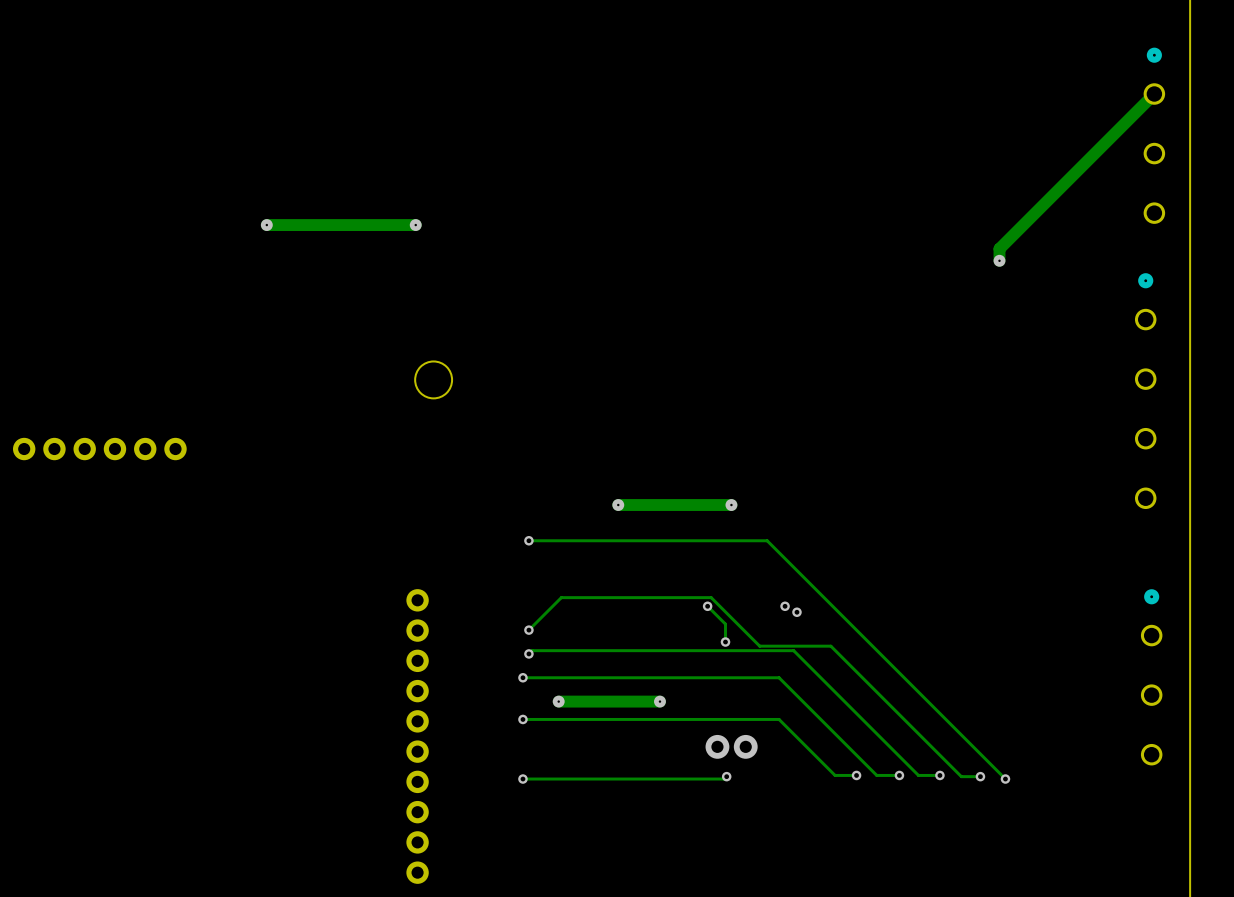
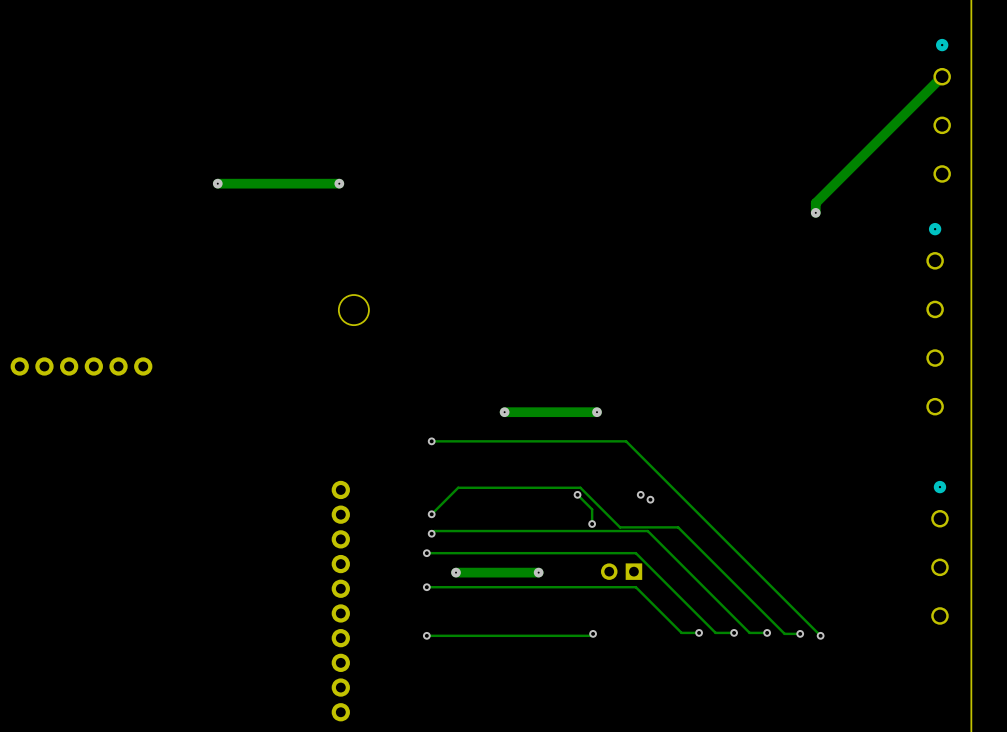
part: none -> (621, 571)
via: (717, 746) -> none
via: (745, 746) -> none

